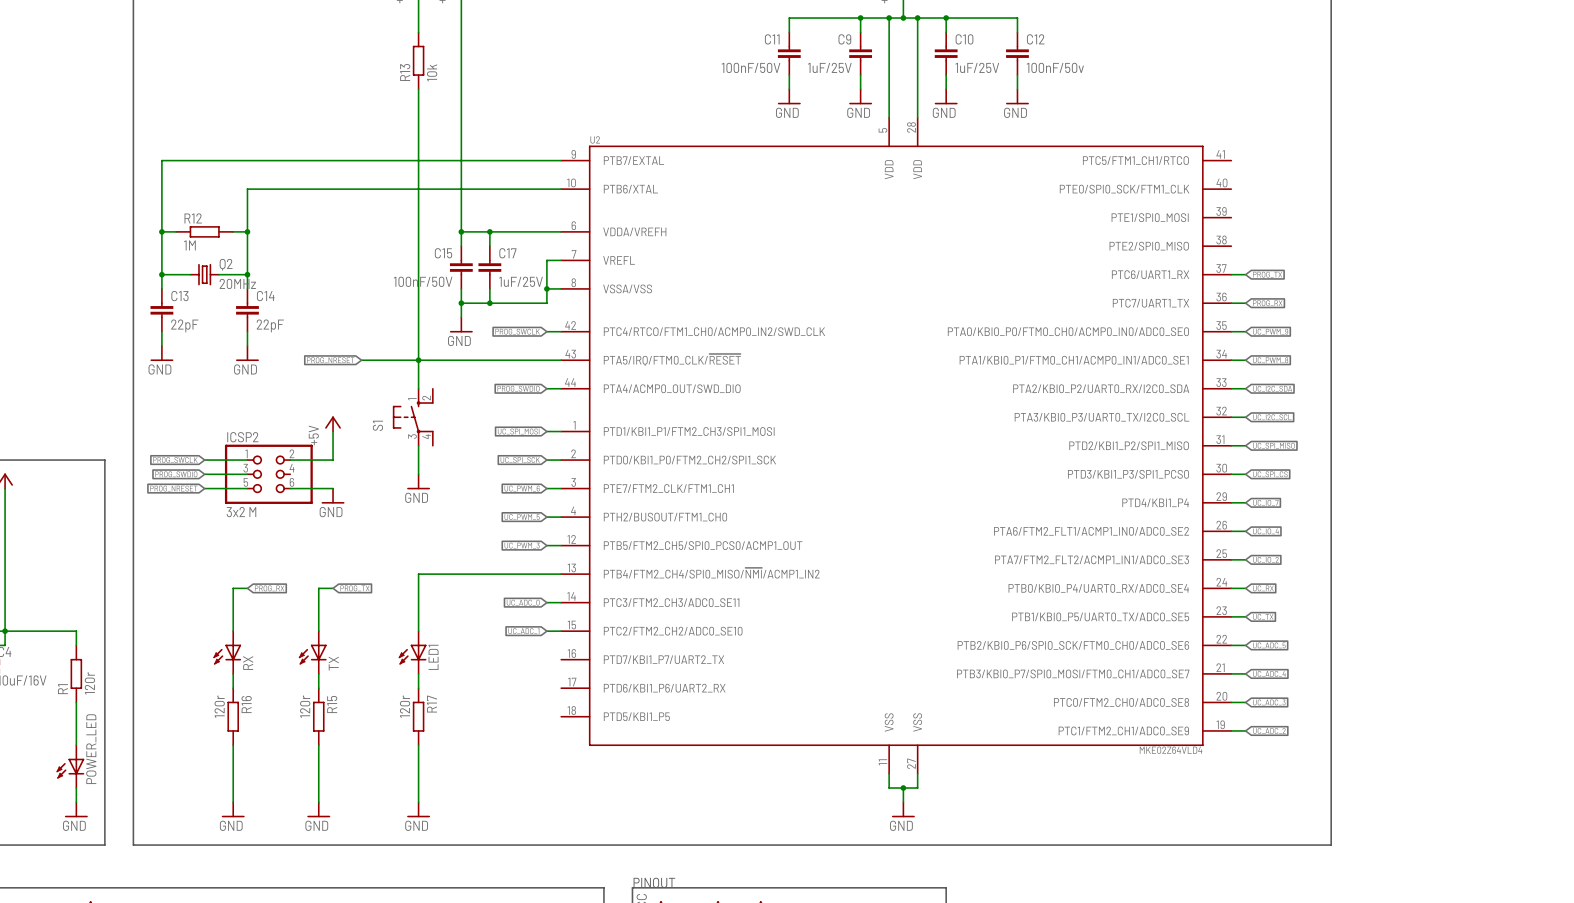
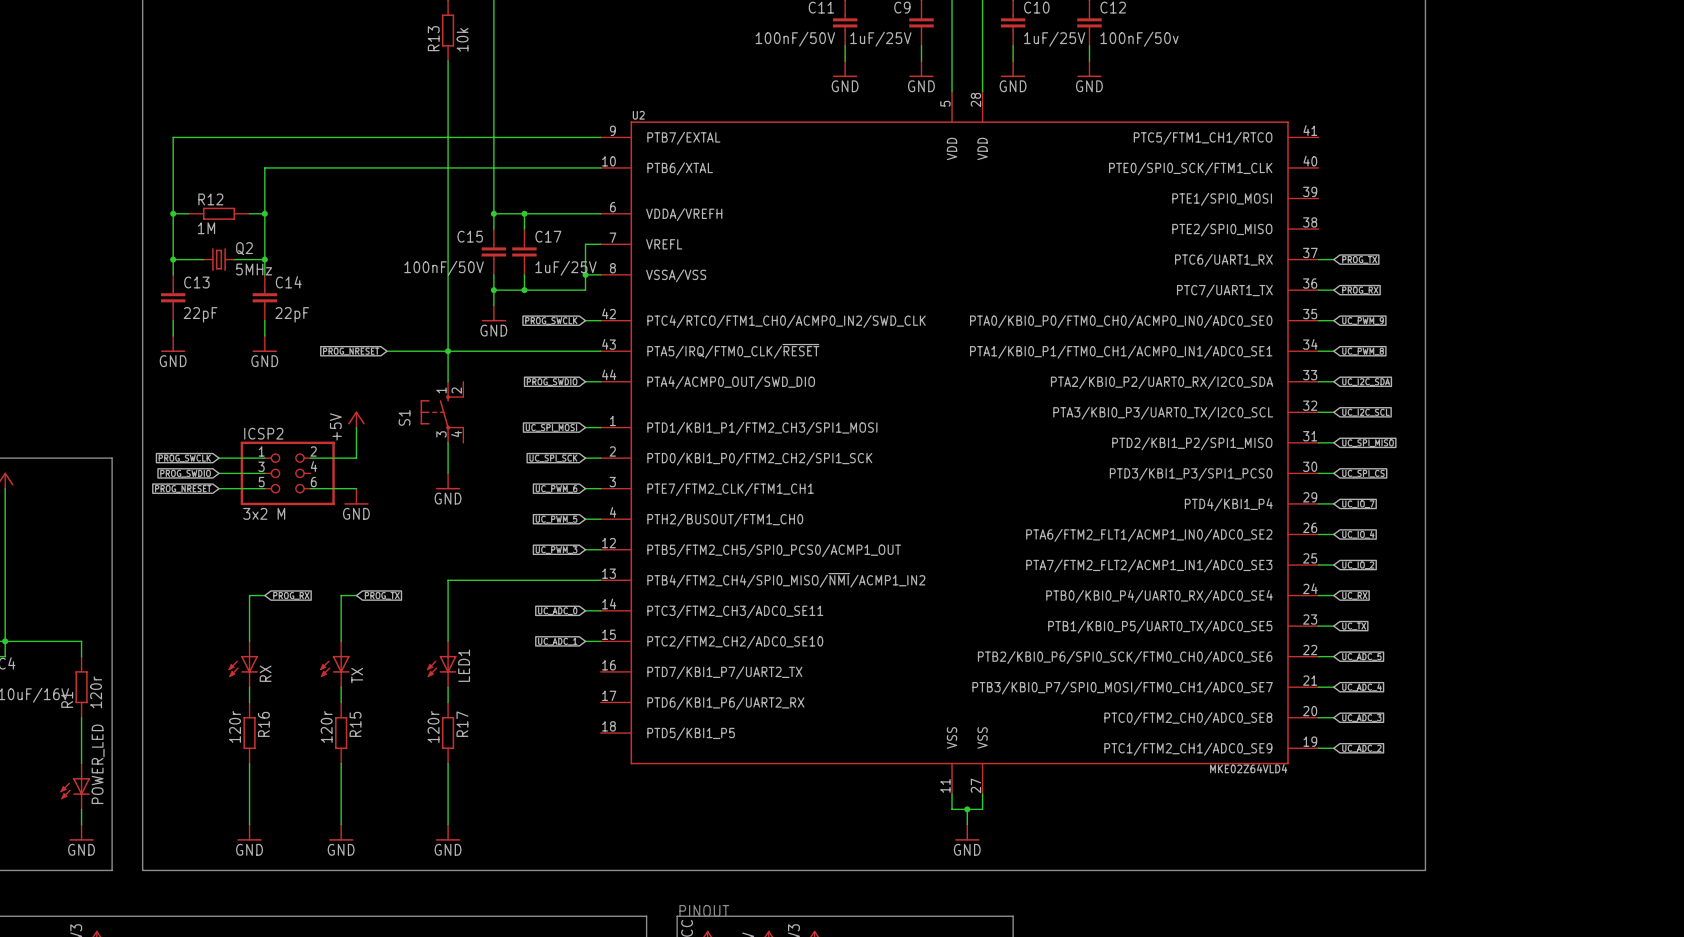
Q2 value: 20MHz (237, 283) -> 5MHz (254, 269)

